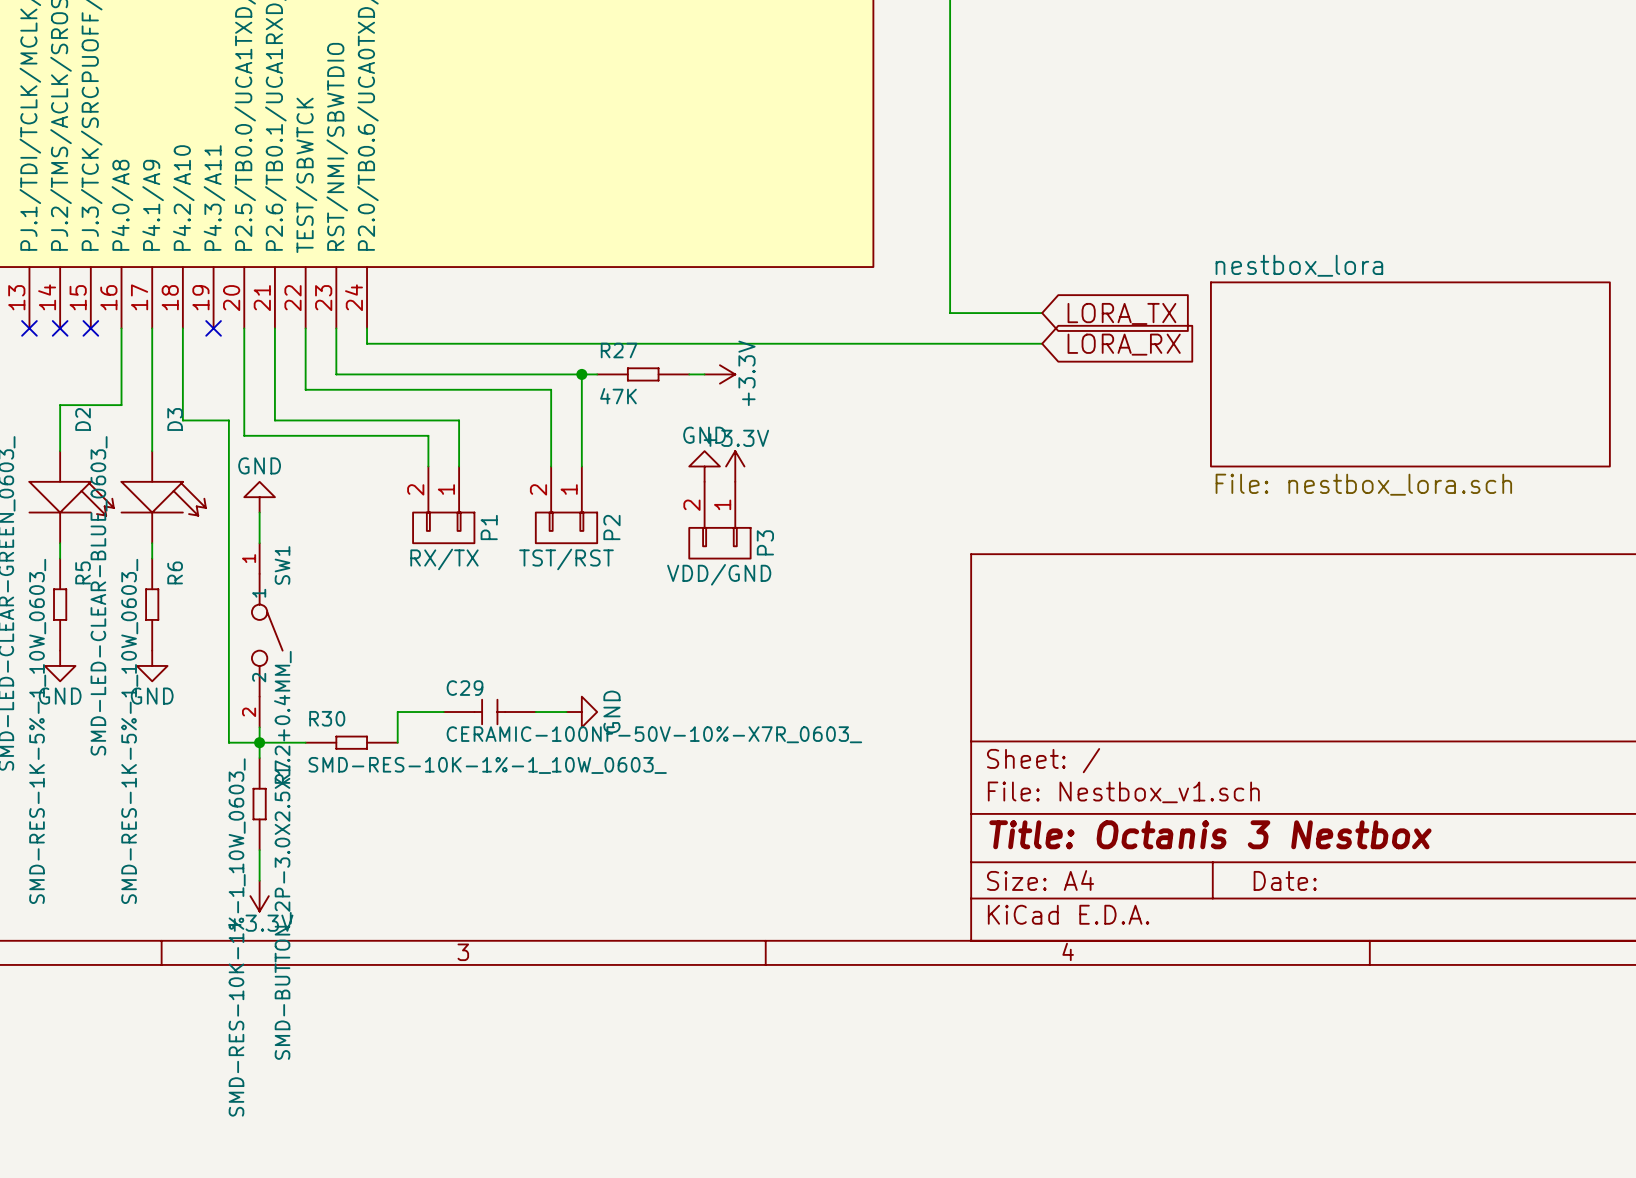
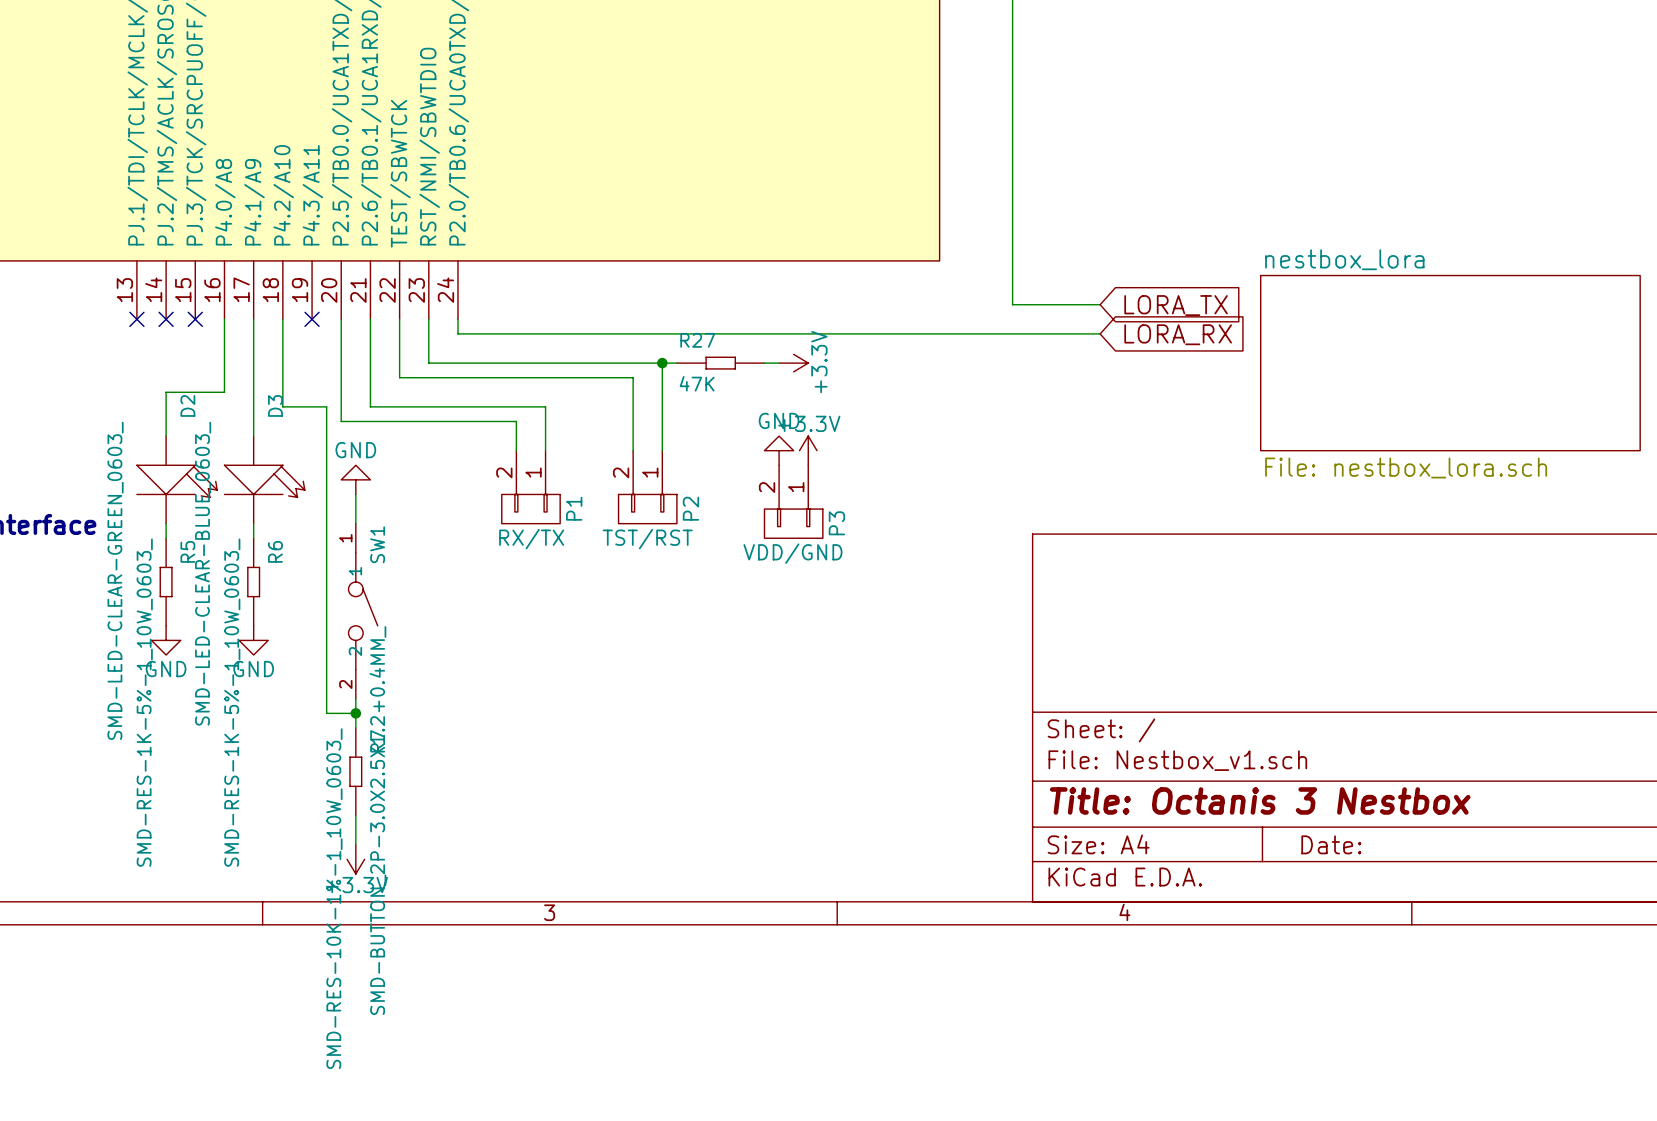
wire: (443, 712) (397, 712) (397, 742) -> none
C29: CERAMIC-100NF-50V-10%-X7R_0603_ (489, 712) -> none
wire: (535, 712) (566, 712) -> none
power symbol: GND (581, 712) -> none
wire: (259, 742) (305, 742) -> none
R30: SMD-RES-10K-1%-1_10W_0603_ (351, 742) -> none

